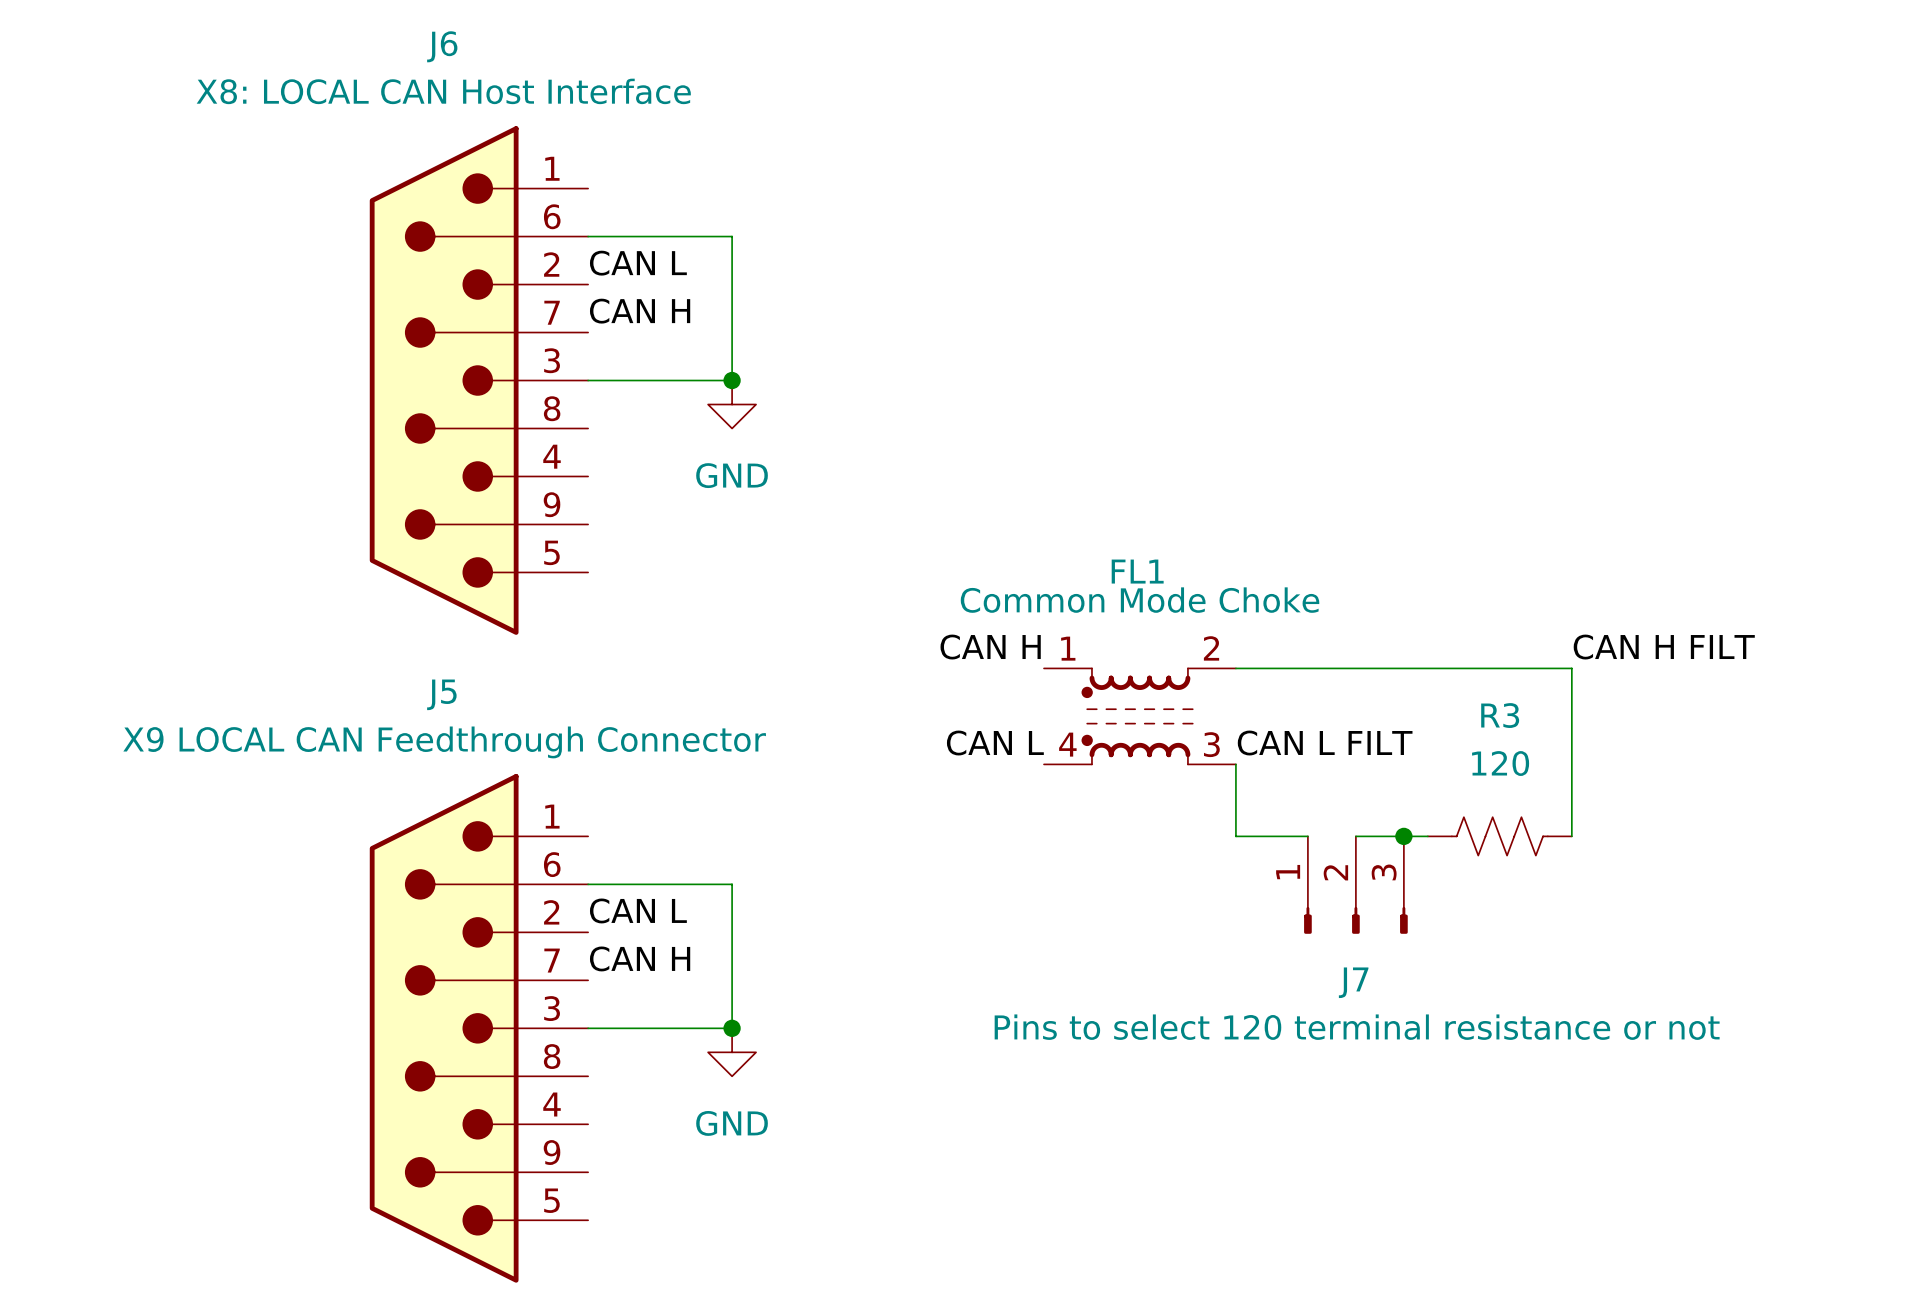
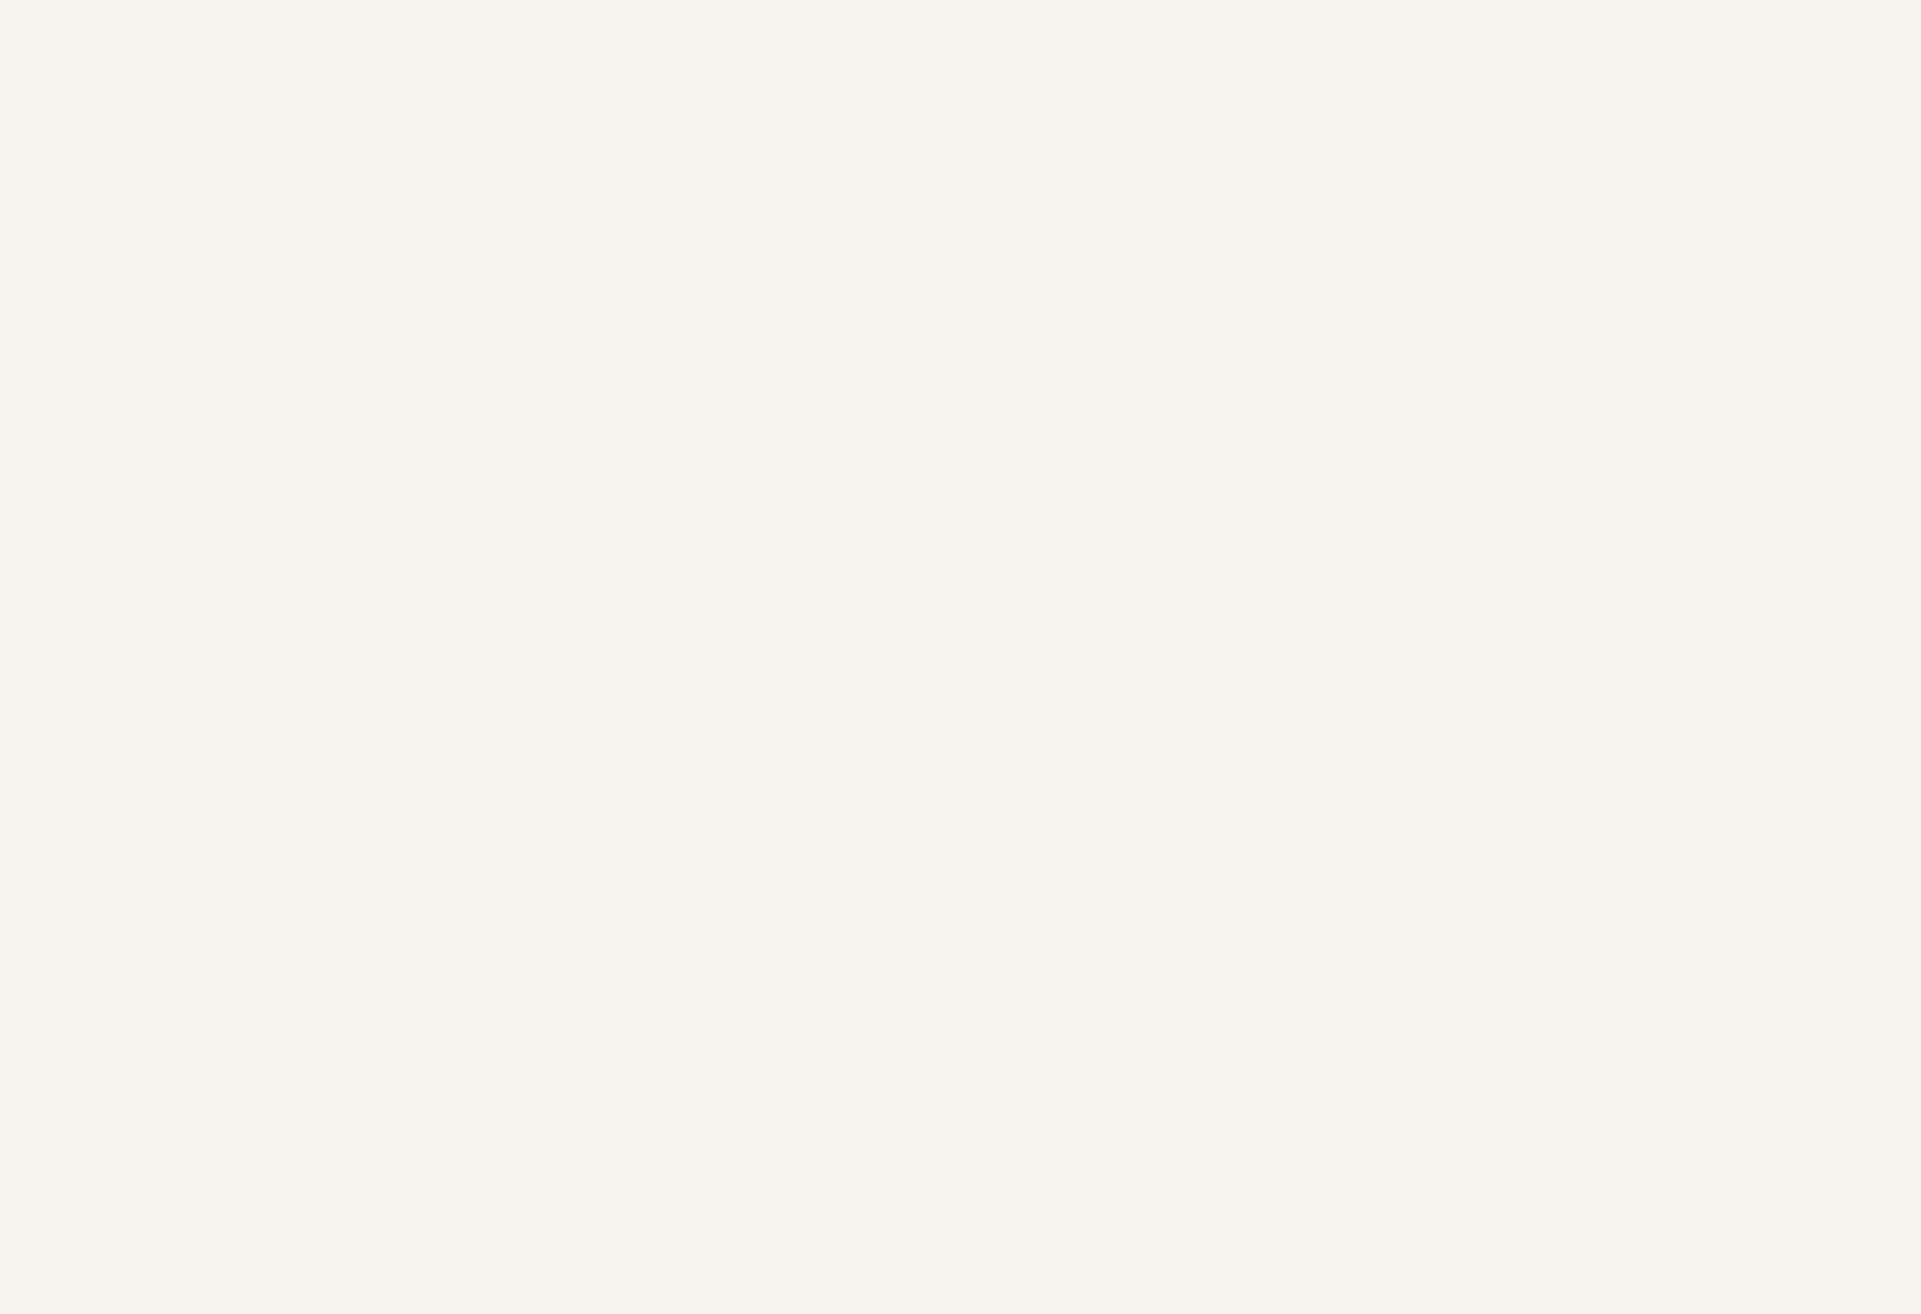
wire: (588, 236) (732, 236) (732, 380) (588, 380) -> none
label: CAN L (638, 263) -> none
label: CAN H (640, 311) -> none
J6: X8: LOCAL CAN Host Interface (478, 380) -> none
junction: (732, 380) -> none
power symbol: GND (732, 404) -> none
label: CAN H (990, 647) -> none
label: CAN H FILT (1664, 647) -> none
wire: (1235, 668) (1571, 668) (1571, 836) -> none
FL1: Common Mode Choke (1139, 716) -> none
label: CAN L (995, 743) -> none
label: CAN L FILT (1325, 743) -> none
wire: (1235, 764) (1235, 836) (1307, 836) -> none
wire: (1355, 836) (1427, 836) -> none
junction: (1403, 836) -> none
R3: 120 (1499, 836) -> none
wire: (588, 884) (732, 884) (732, 1028) (588, 1028) -> none
J7: Pins to select 120 terminal resistance or not (1355, 885) -> none
label: CAN L (638, 910) -> none
label: CAN H (640, 958) -> none
J5: X9 LOCAL CAN Feedthrough Connector (478, 1028) -> none
junction: (732, 1028) -> none
power symbol: GND (732, 1052) -> none

